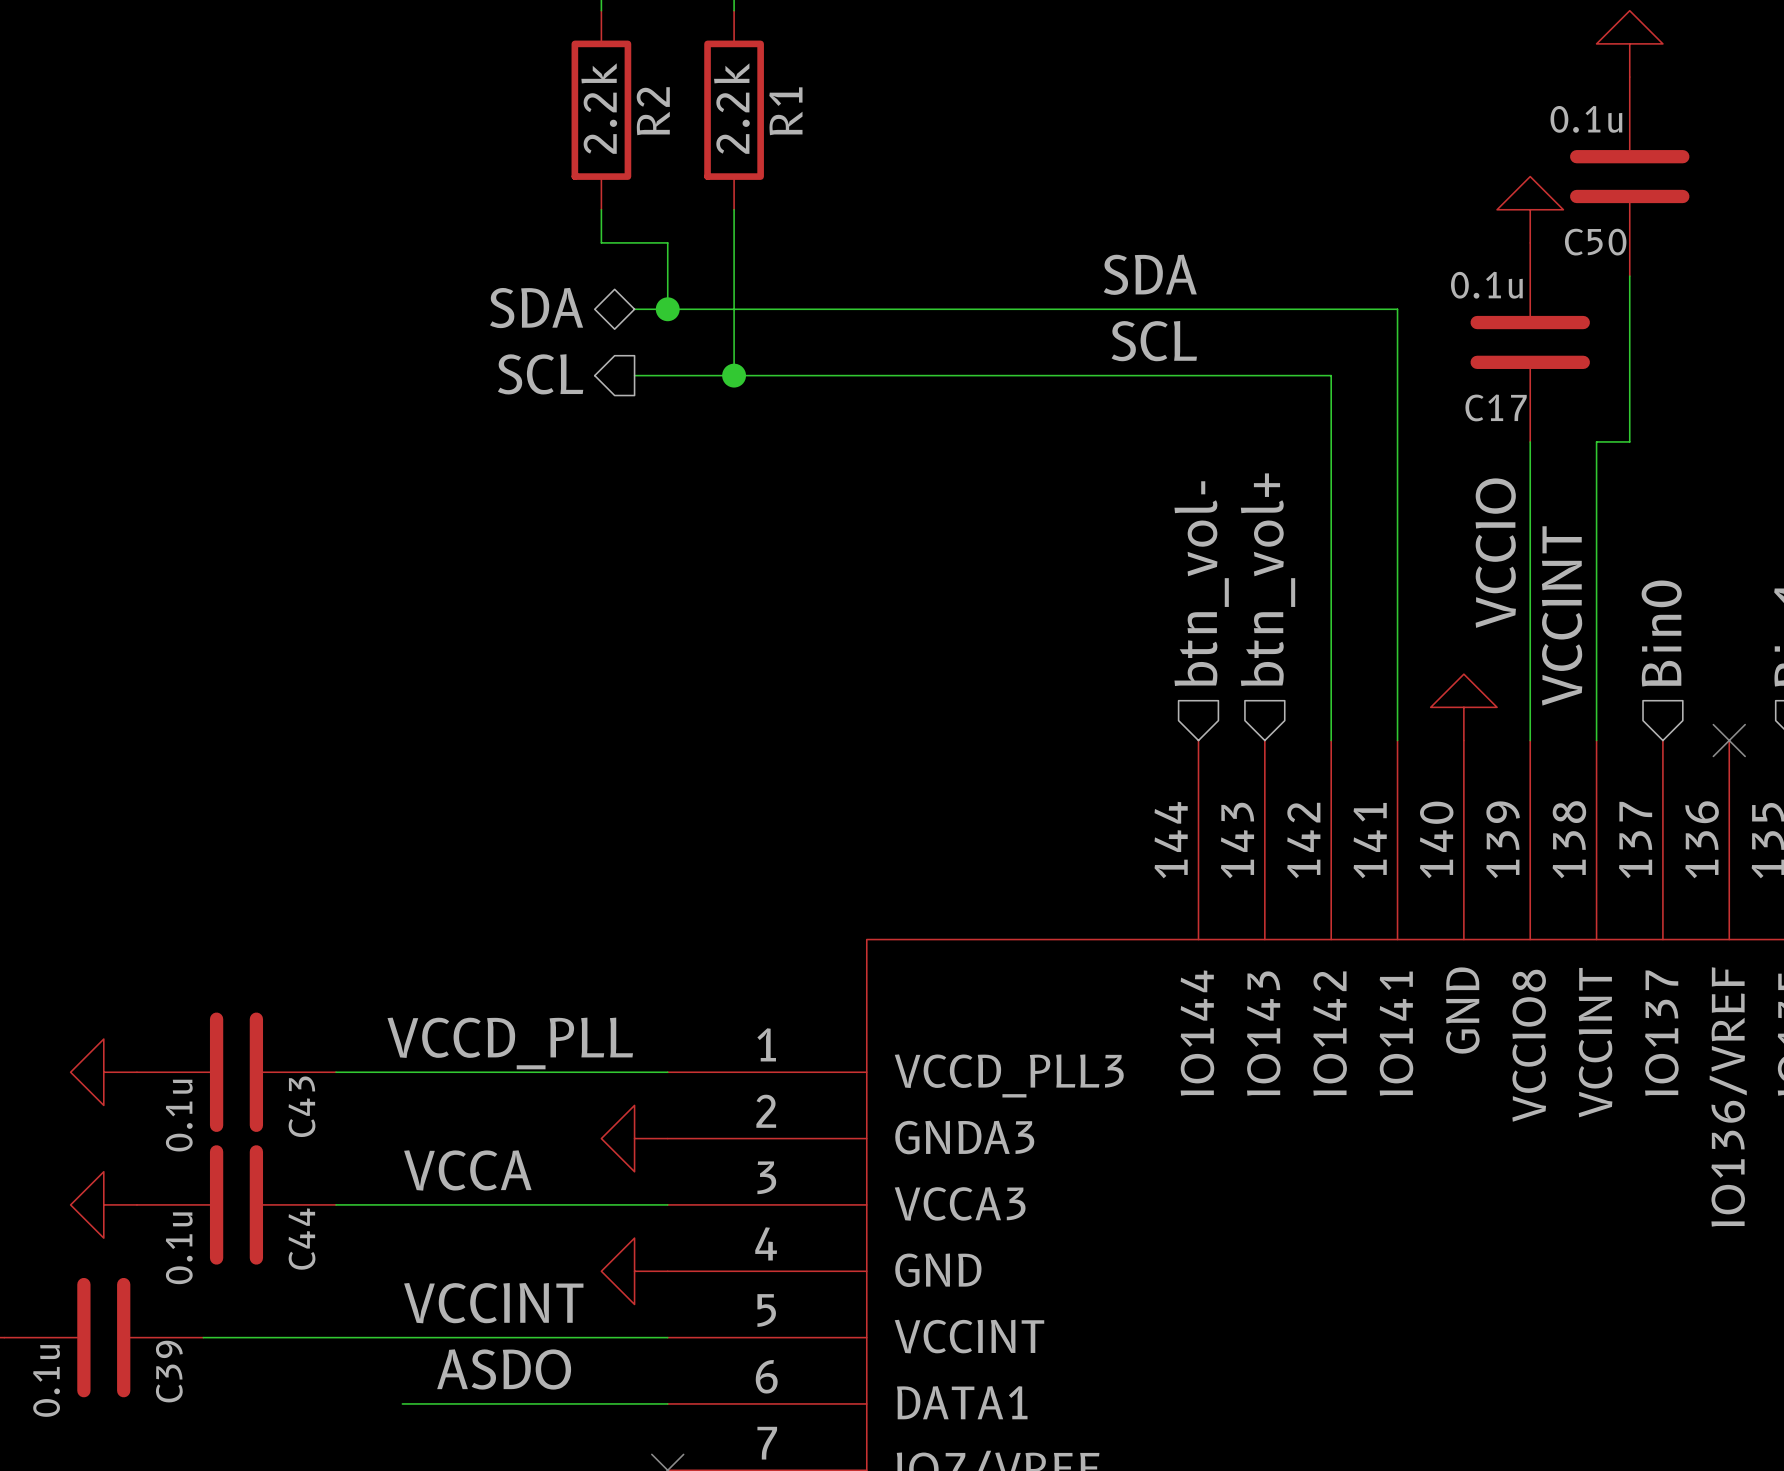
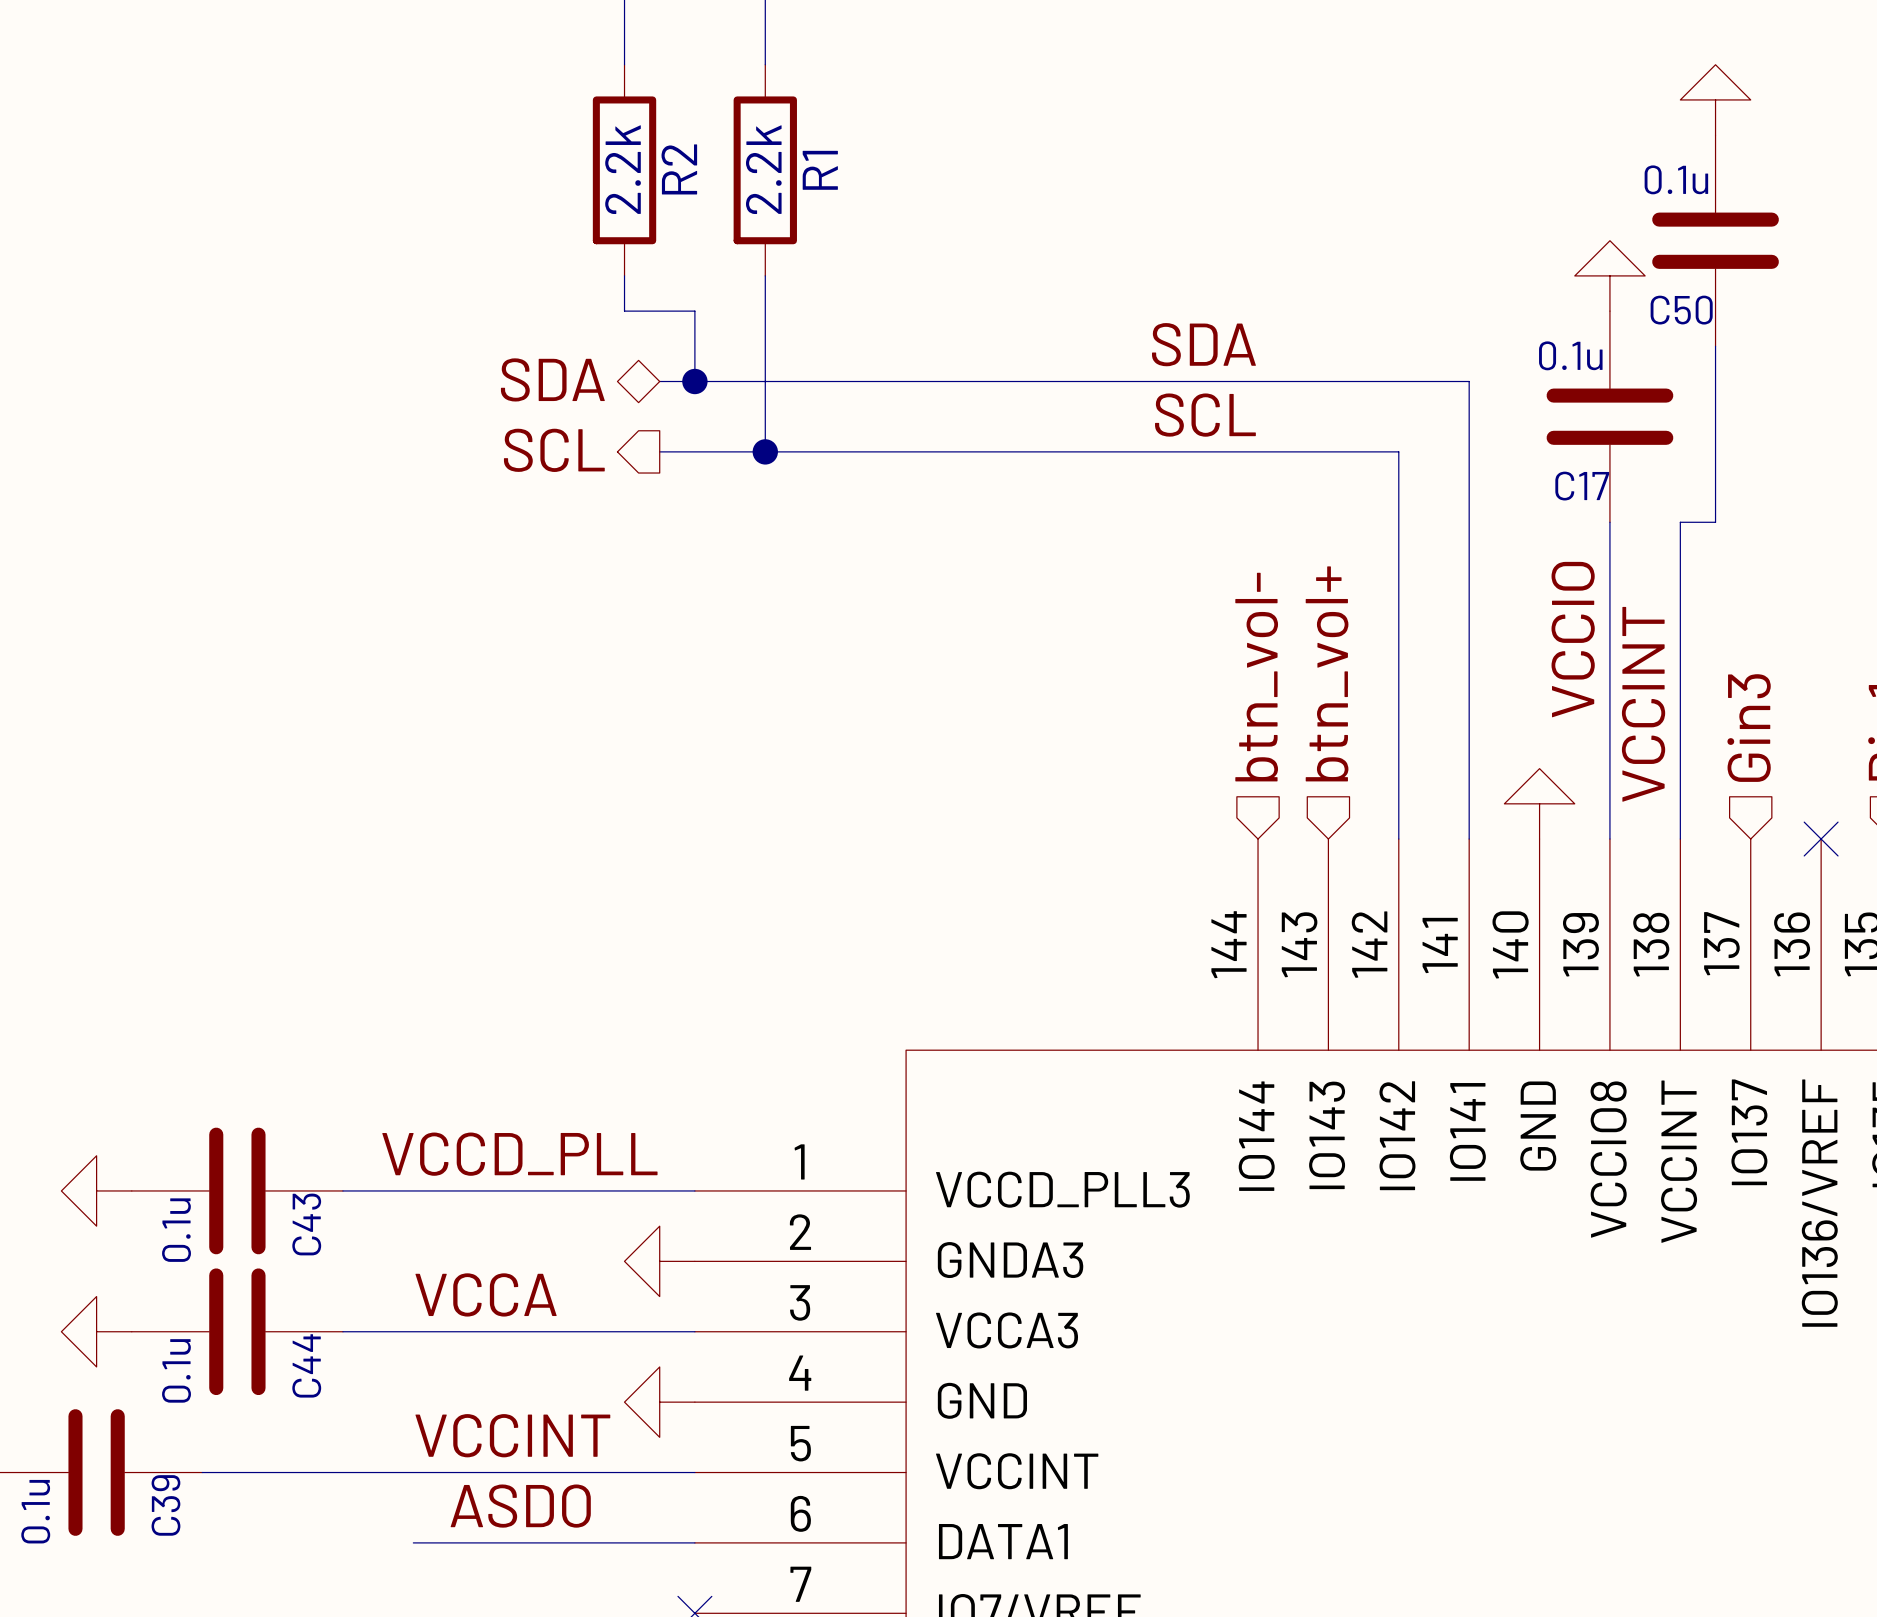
hierarchical label: Bin0 (1661, 633) -> Gin3 (1749, 728)

